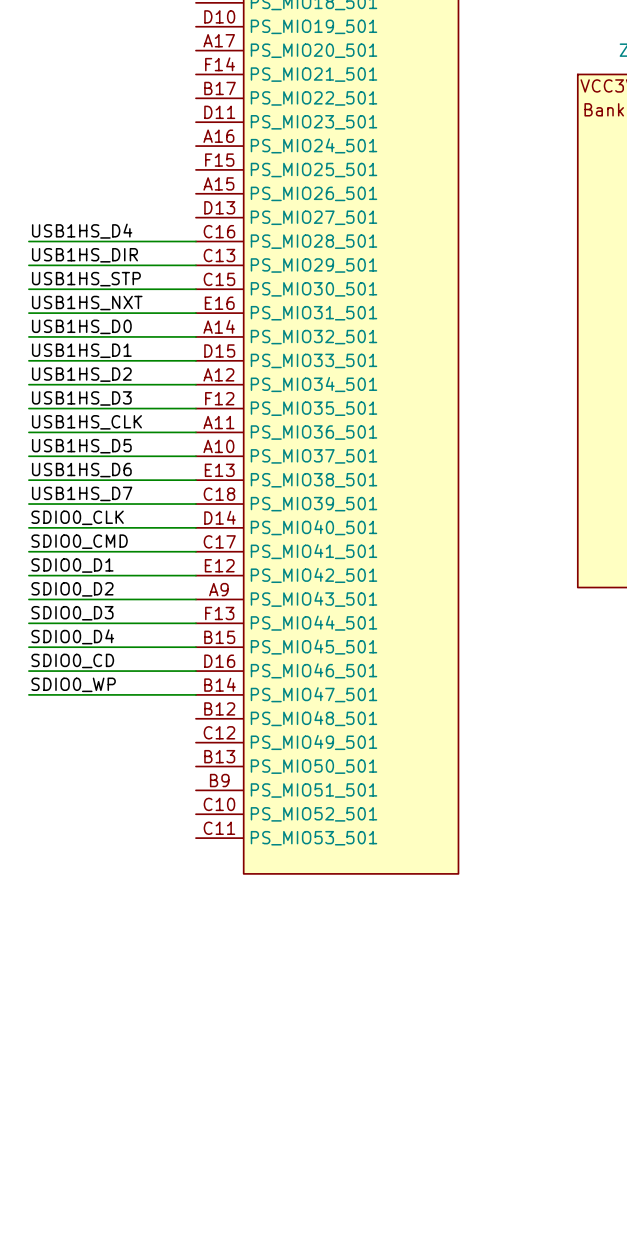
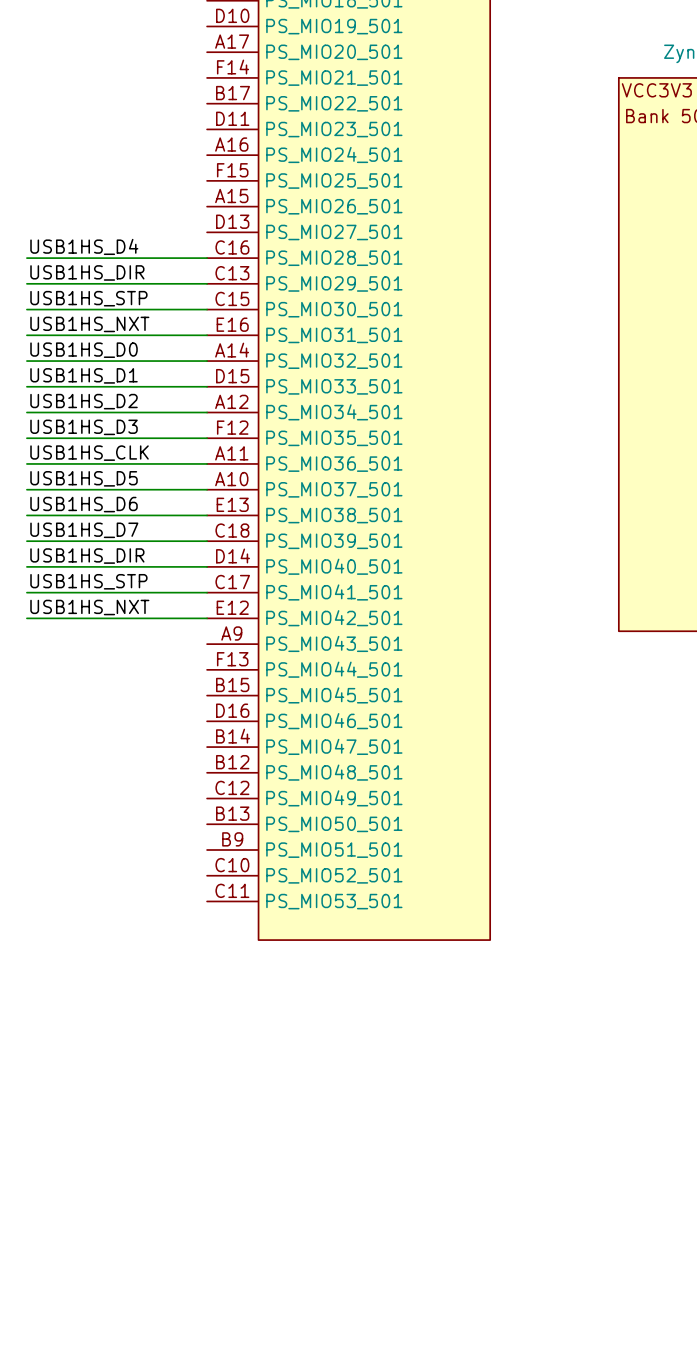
label: SDIO0_CLK (77, 517) -> USB1HS_DIR (87, 556)
label: SDIO0_CMD (79, 541) -> USB1HS_STP (88, 581)
label: SDIO0_D1 (72, 565) -> USB1HS_NXT (89, 607)
label: SDIO0_D2 (72, 589) -> none
wire: (28, 599) (195, 599) -> none
label: SDIO0_D3 (72, 613) -> none
wire: (28, 623) (195, 623) -> none
label: SDIO0_D4 (72, 636) -> none
wire: (28, 647) (195, 647) -> none
label: SDIO0_CD (72, 660) -> none
wire: (28, 671) (195, 671) -> none
label: SDIO0_WP (73, 684) -> none
wire: (28, 694) (195, 694) -> none

